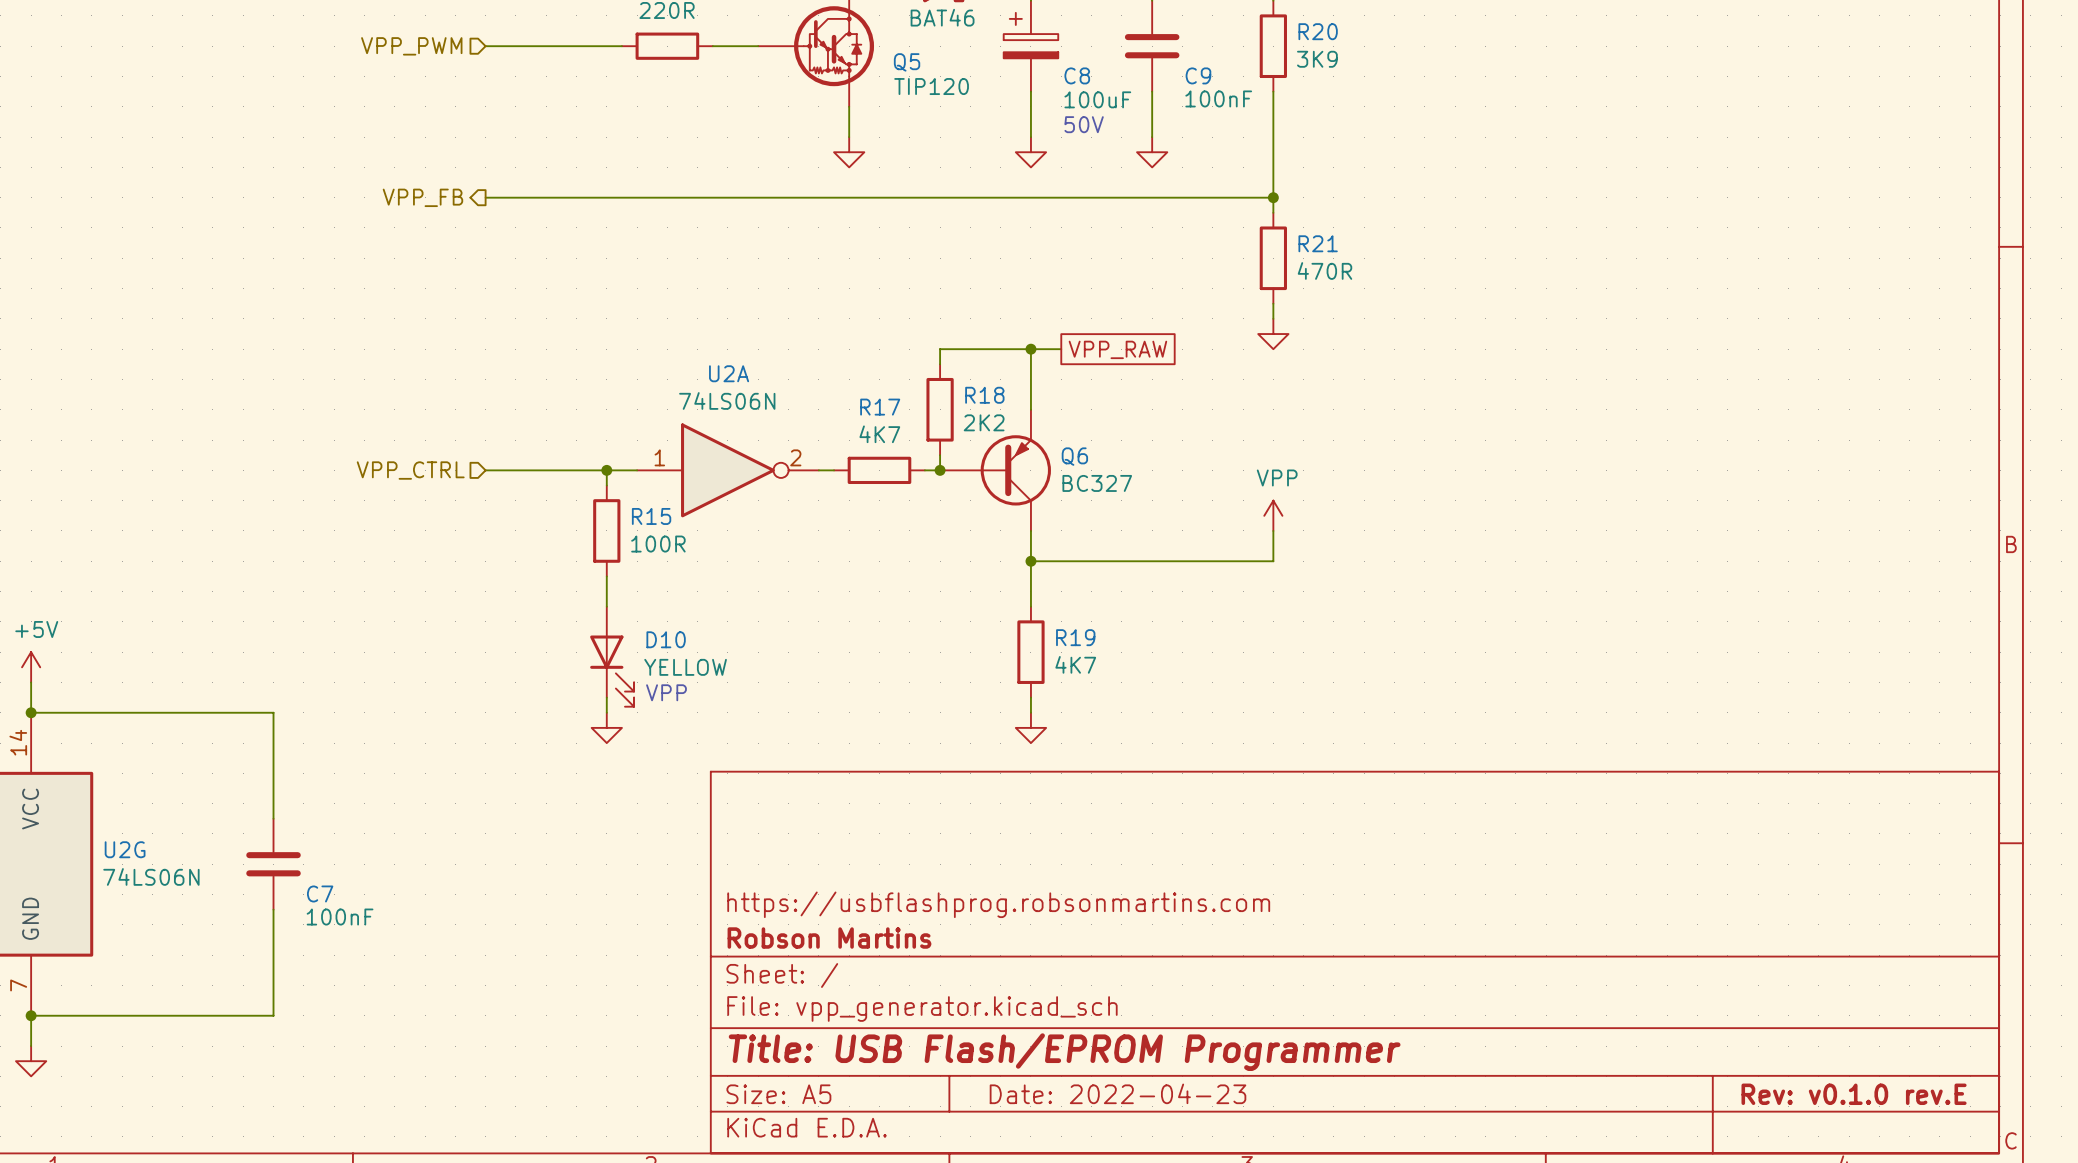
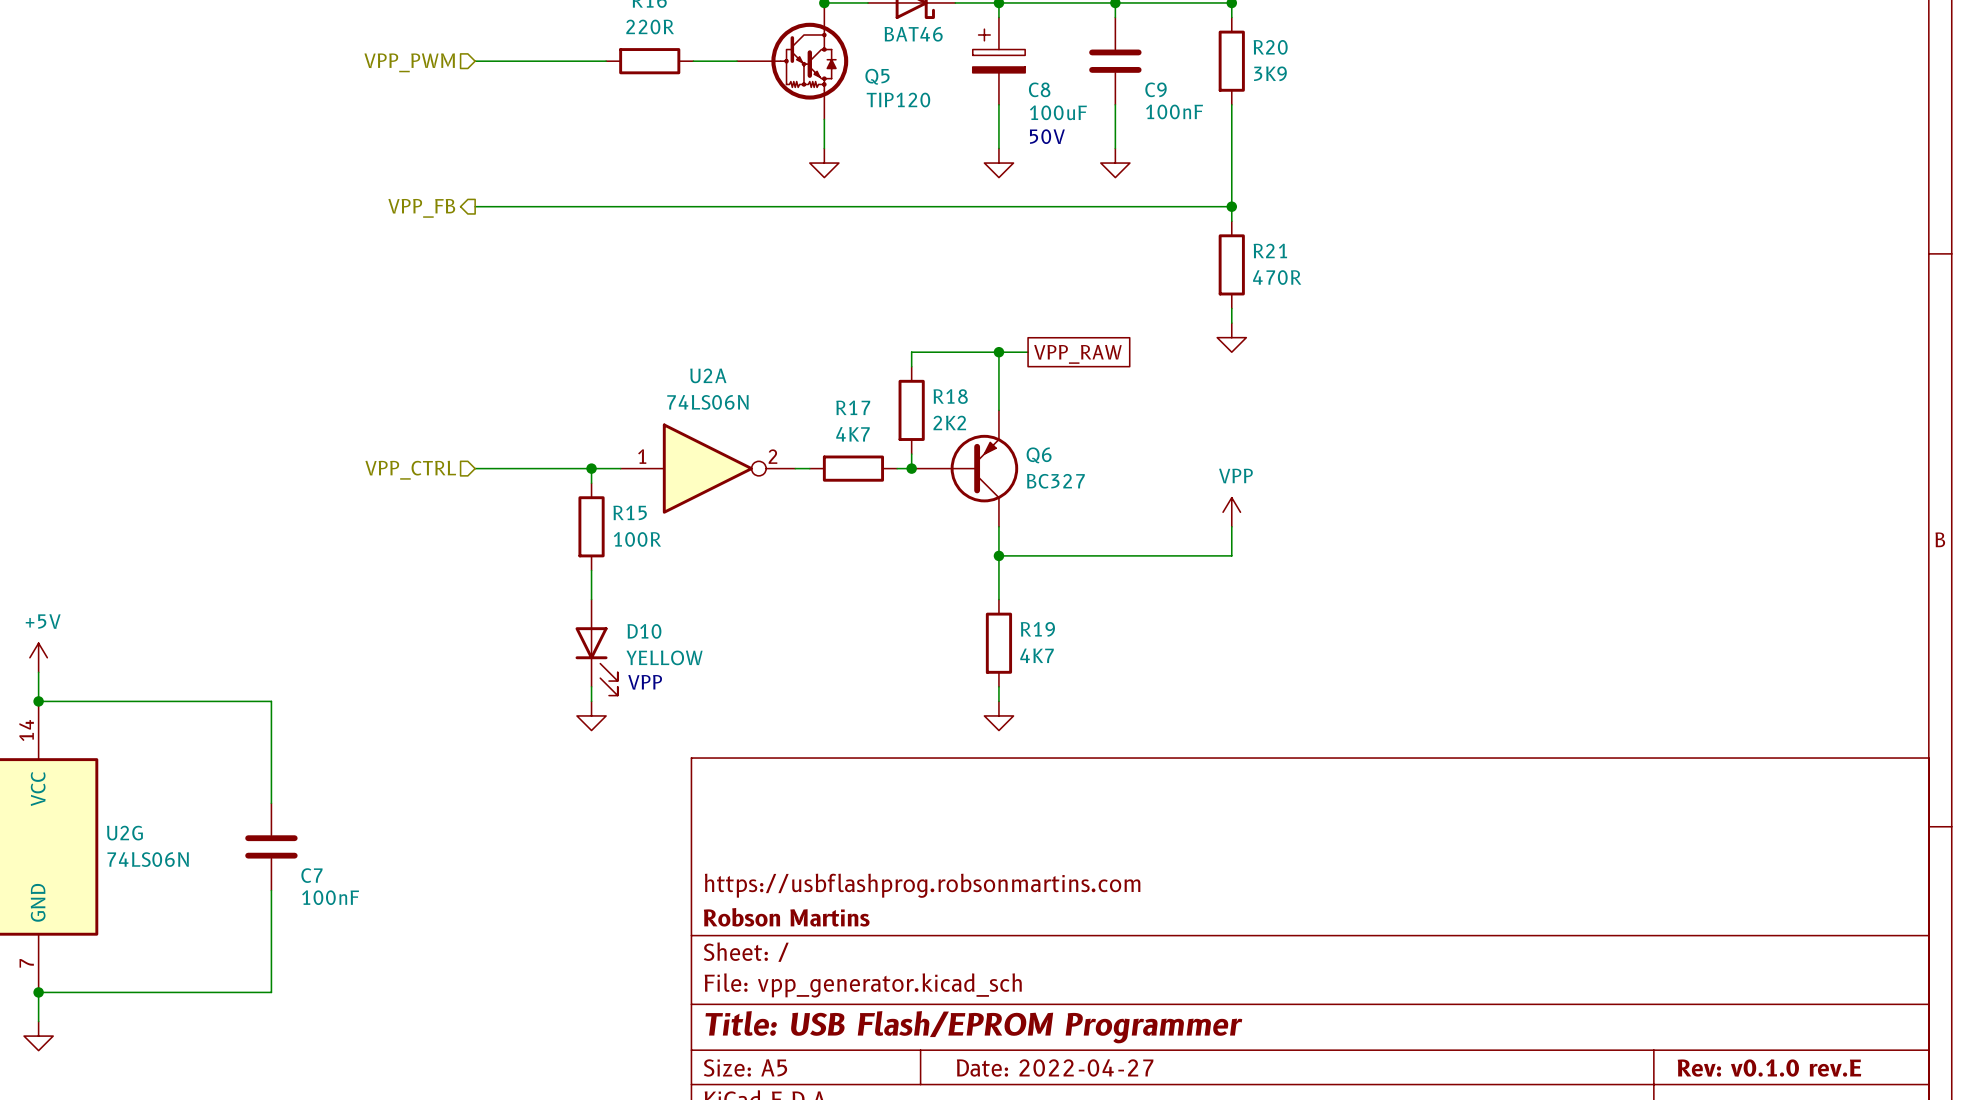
title block: Date: 2022-04-23 (1118, 1093) -> Date: 2022-04-27 (1055, 1067)

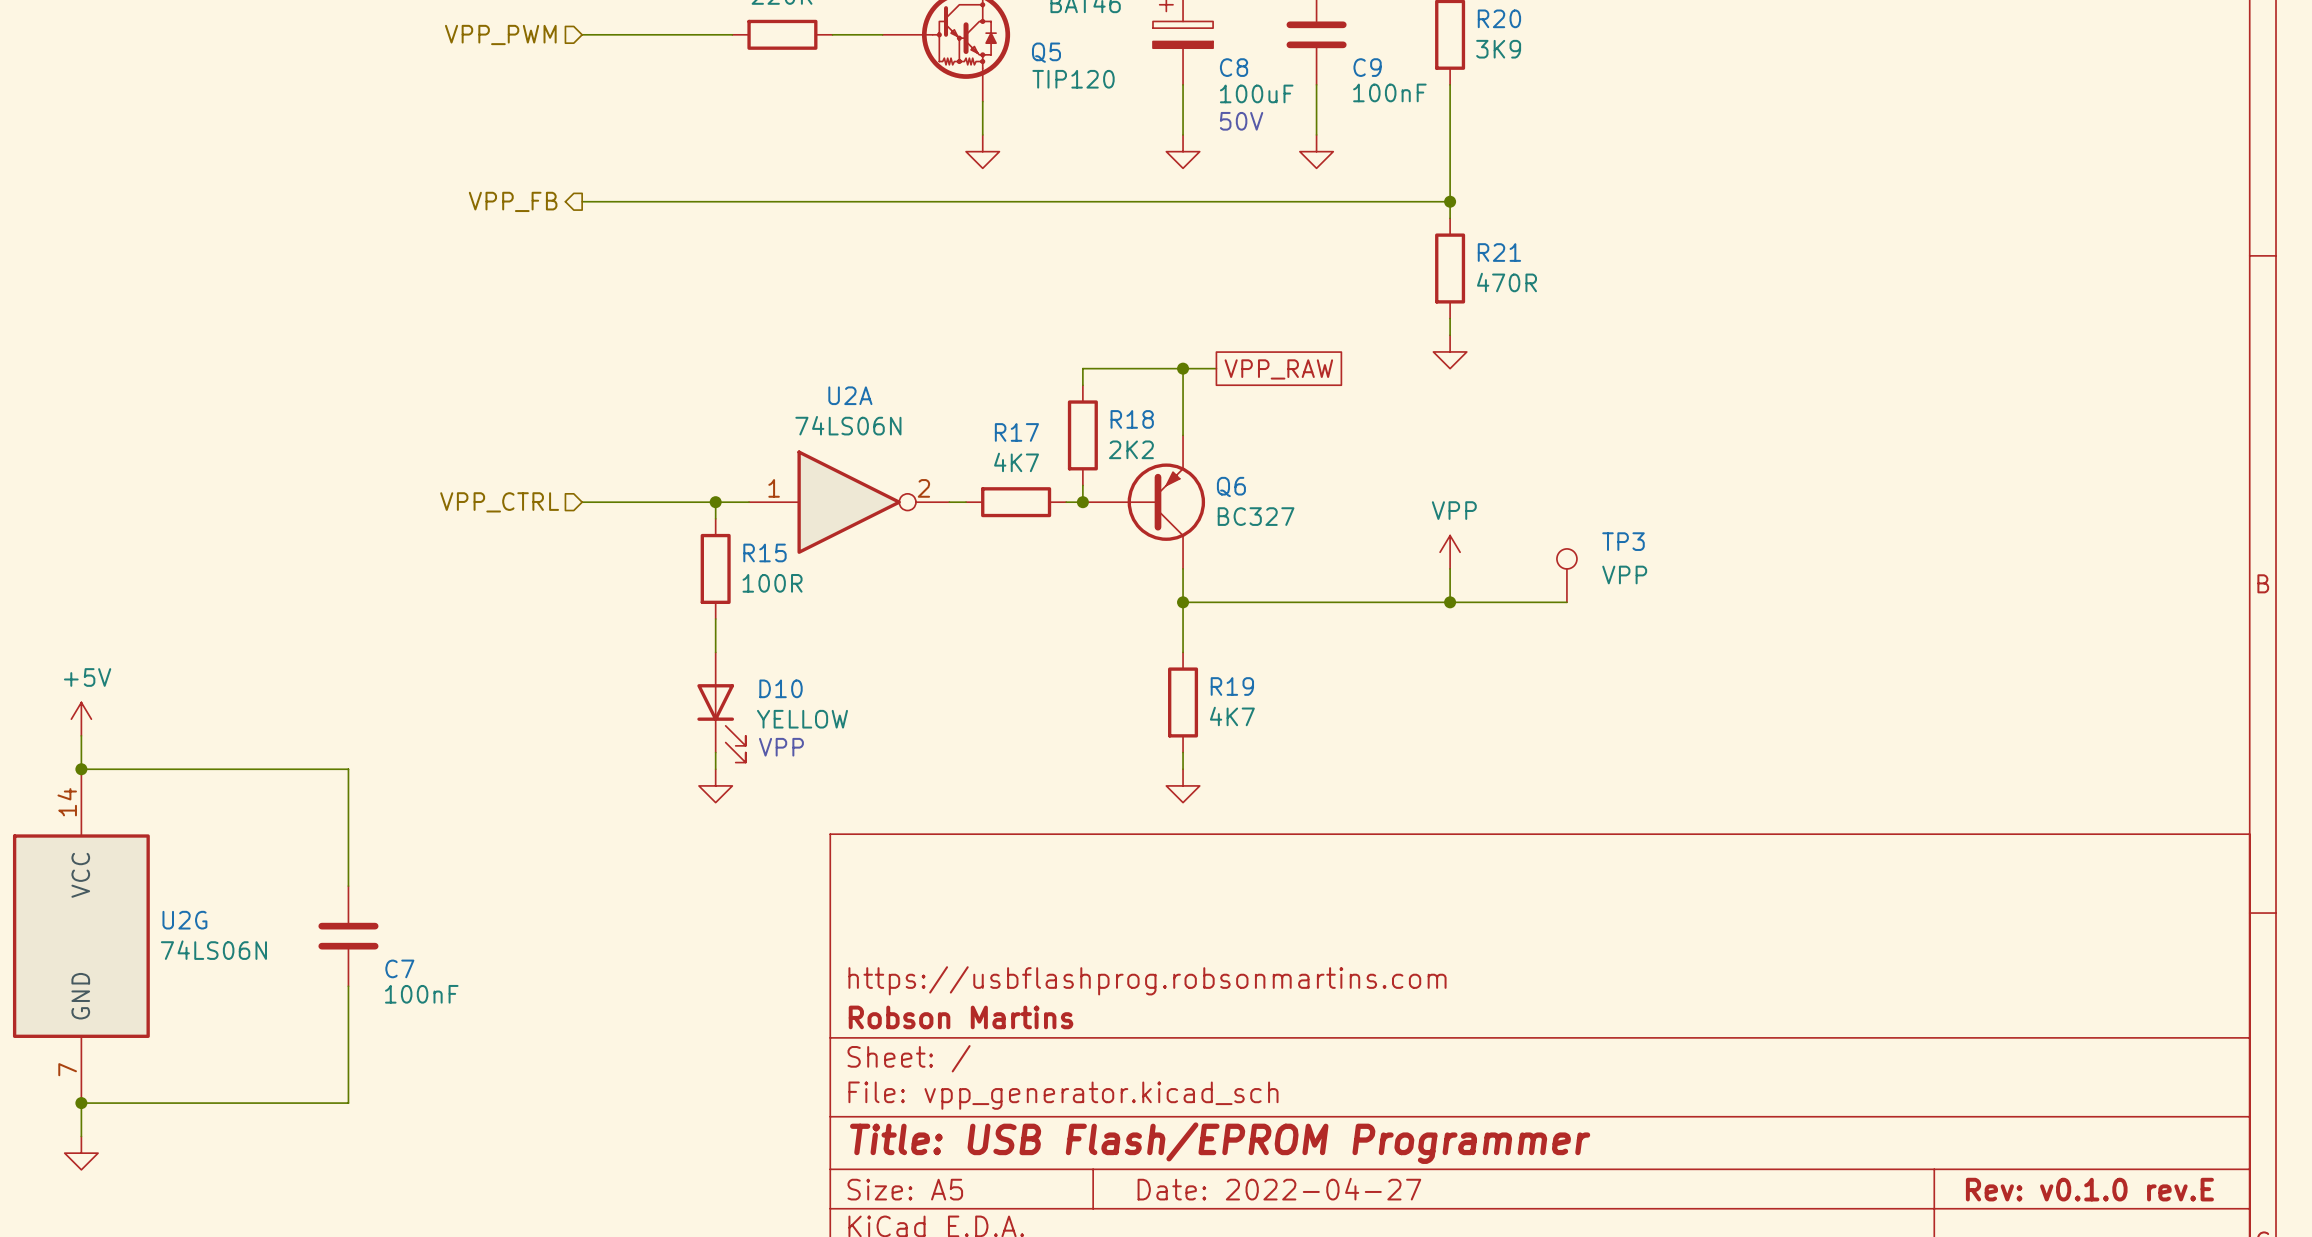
TP3: none -> VPP (1566, 575)
wire: none -> (1450, 602) (1566, 602)
junction: none -> (1450, 602)

